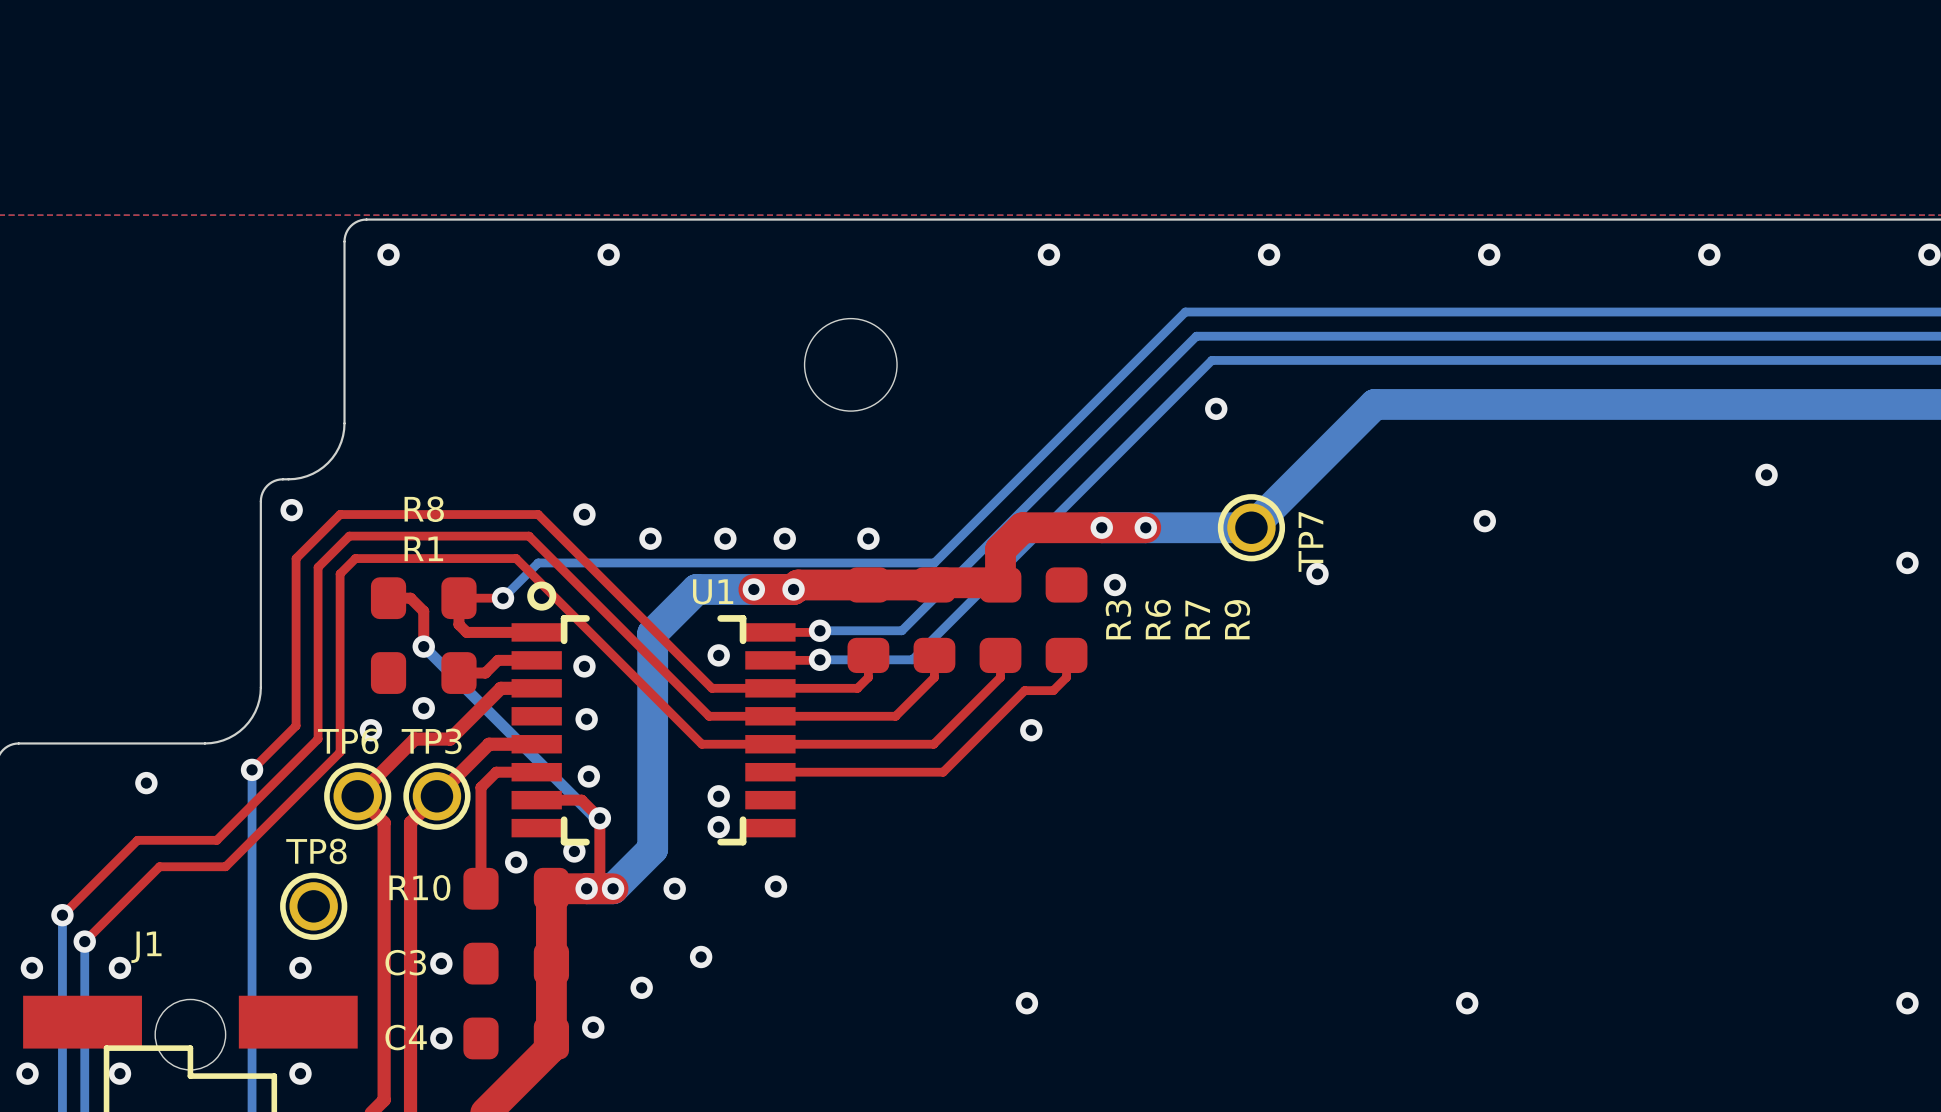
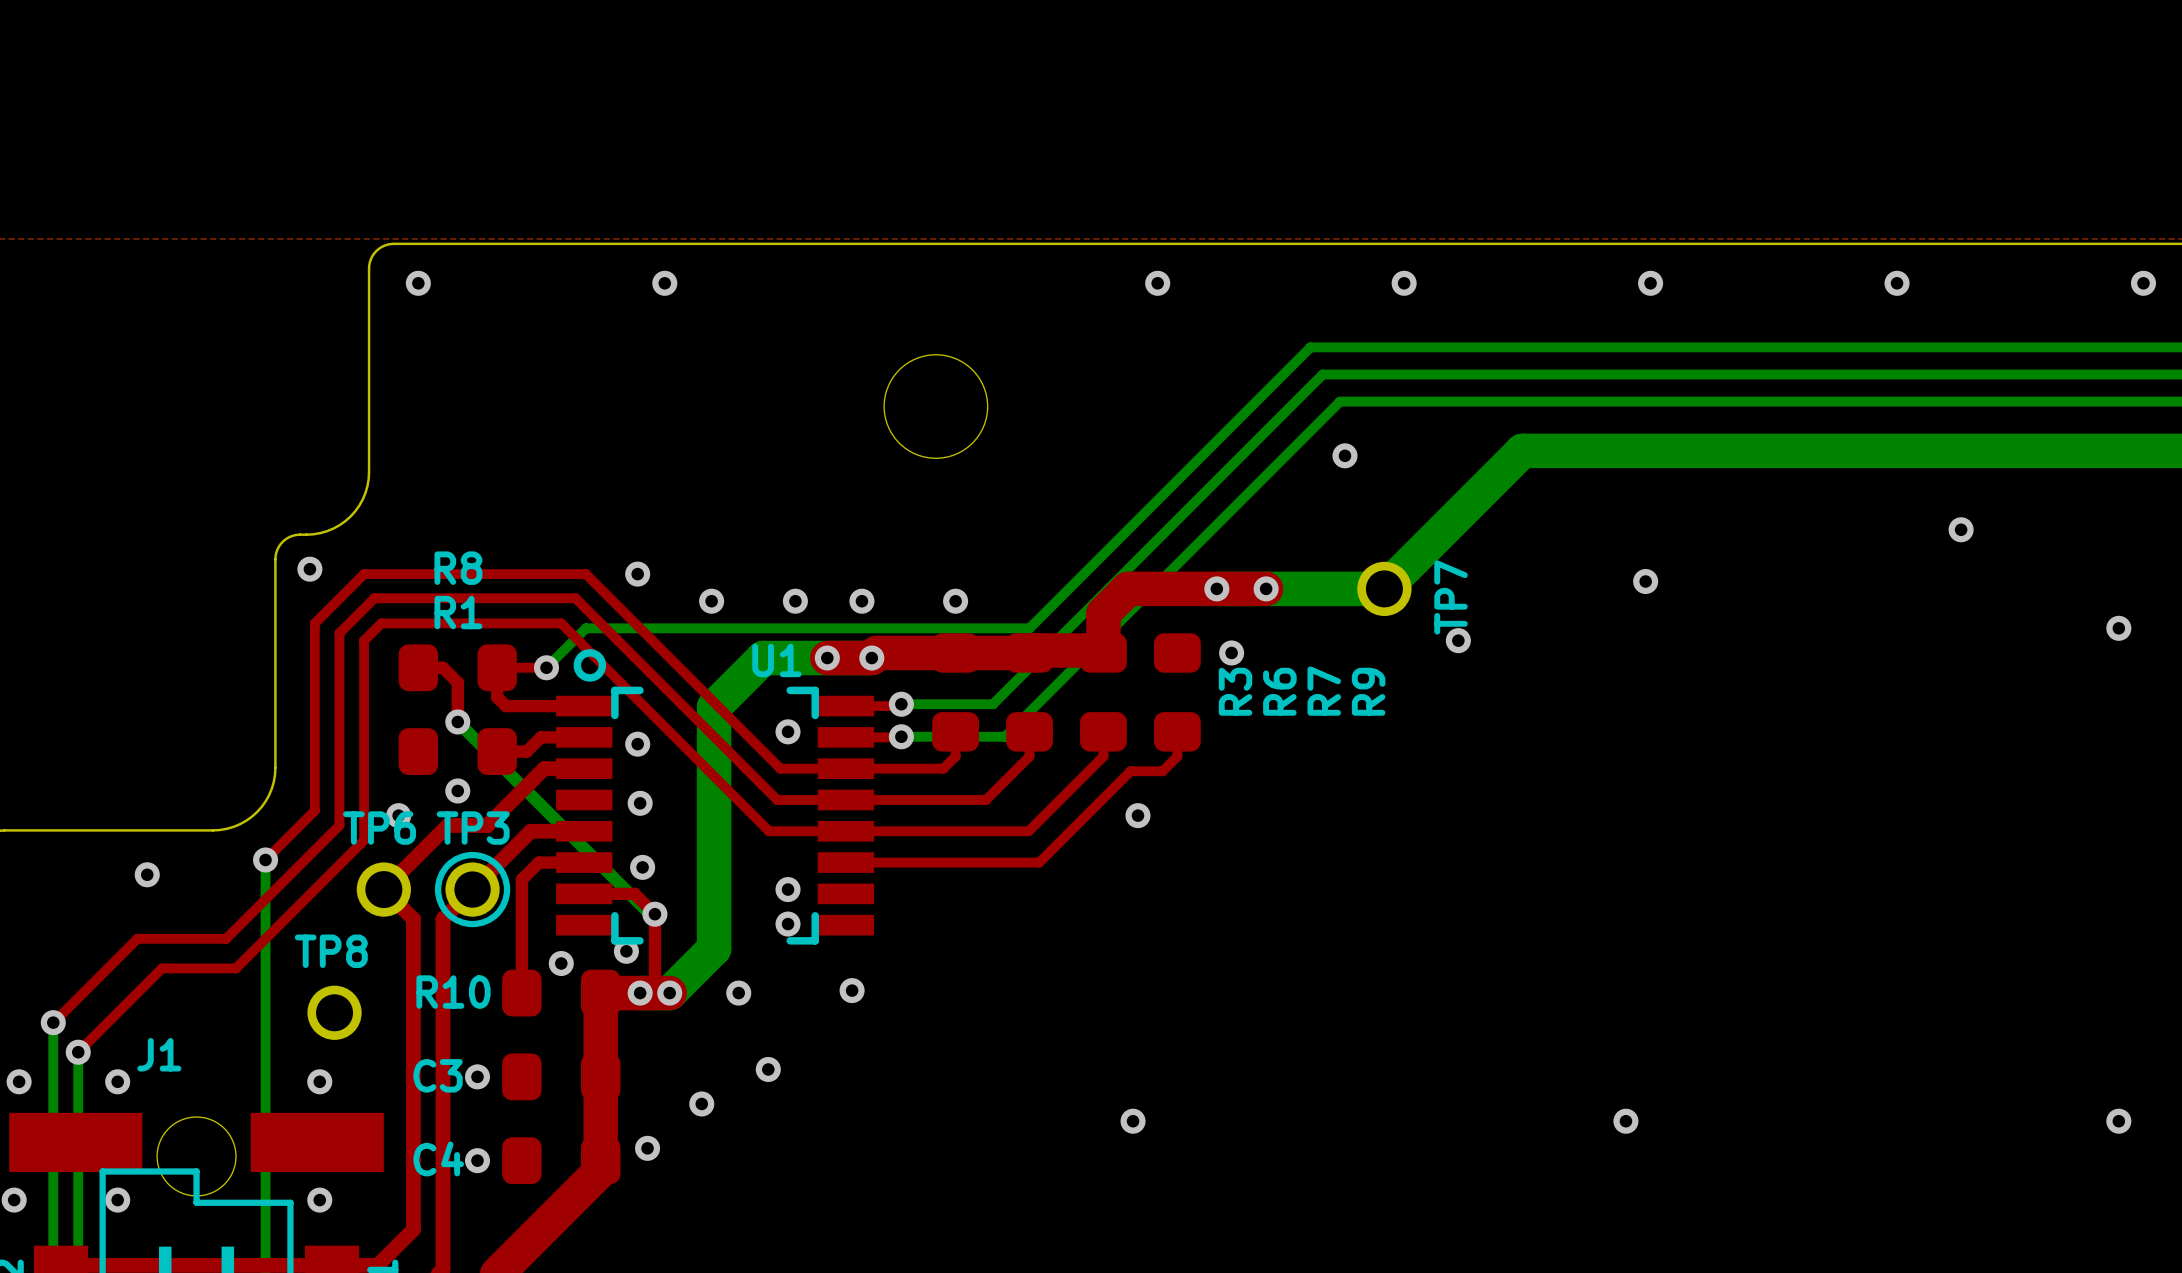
TP7 footprint: [1217, 494, 1286, 562] -> [1357, 561, 1412, 617]
TP6 footprint: [324, 762, 392, 830] -> [356, 862, 411, 917]
TP8 footprint: [280, 872, 348, 940] -> [307, 985, 362, 1040]

